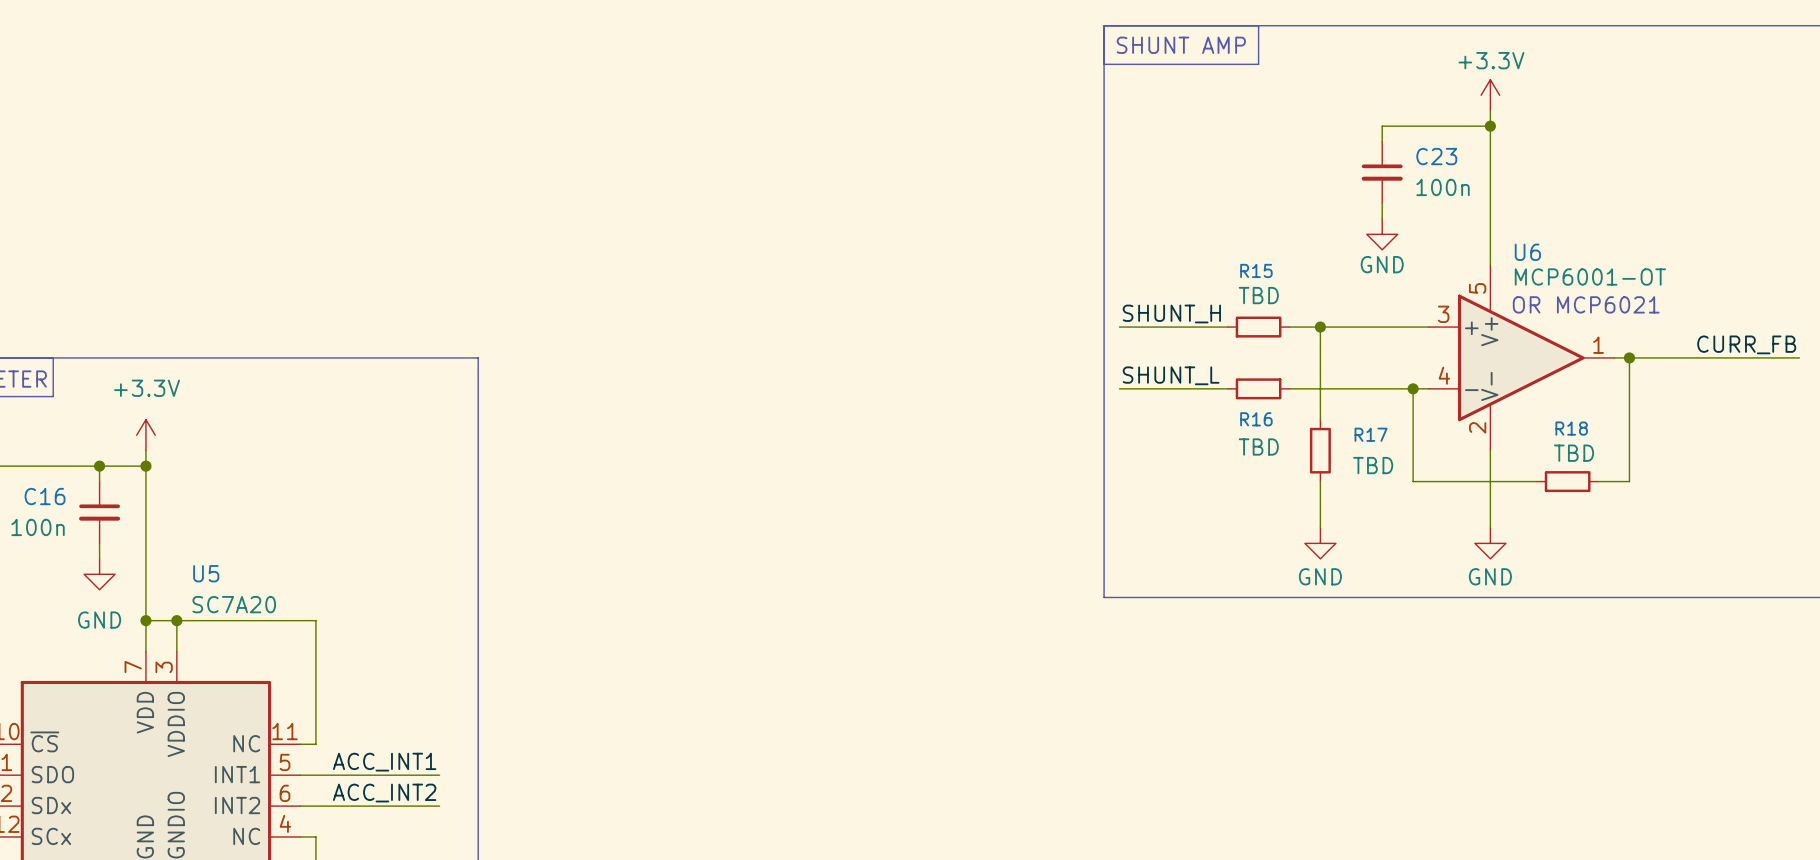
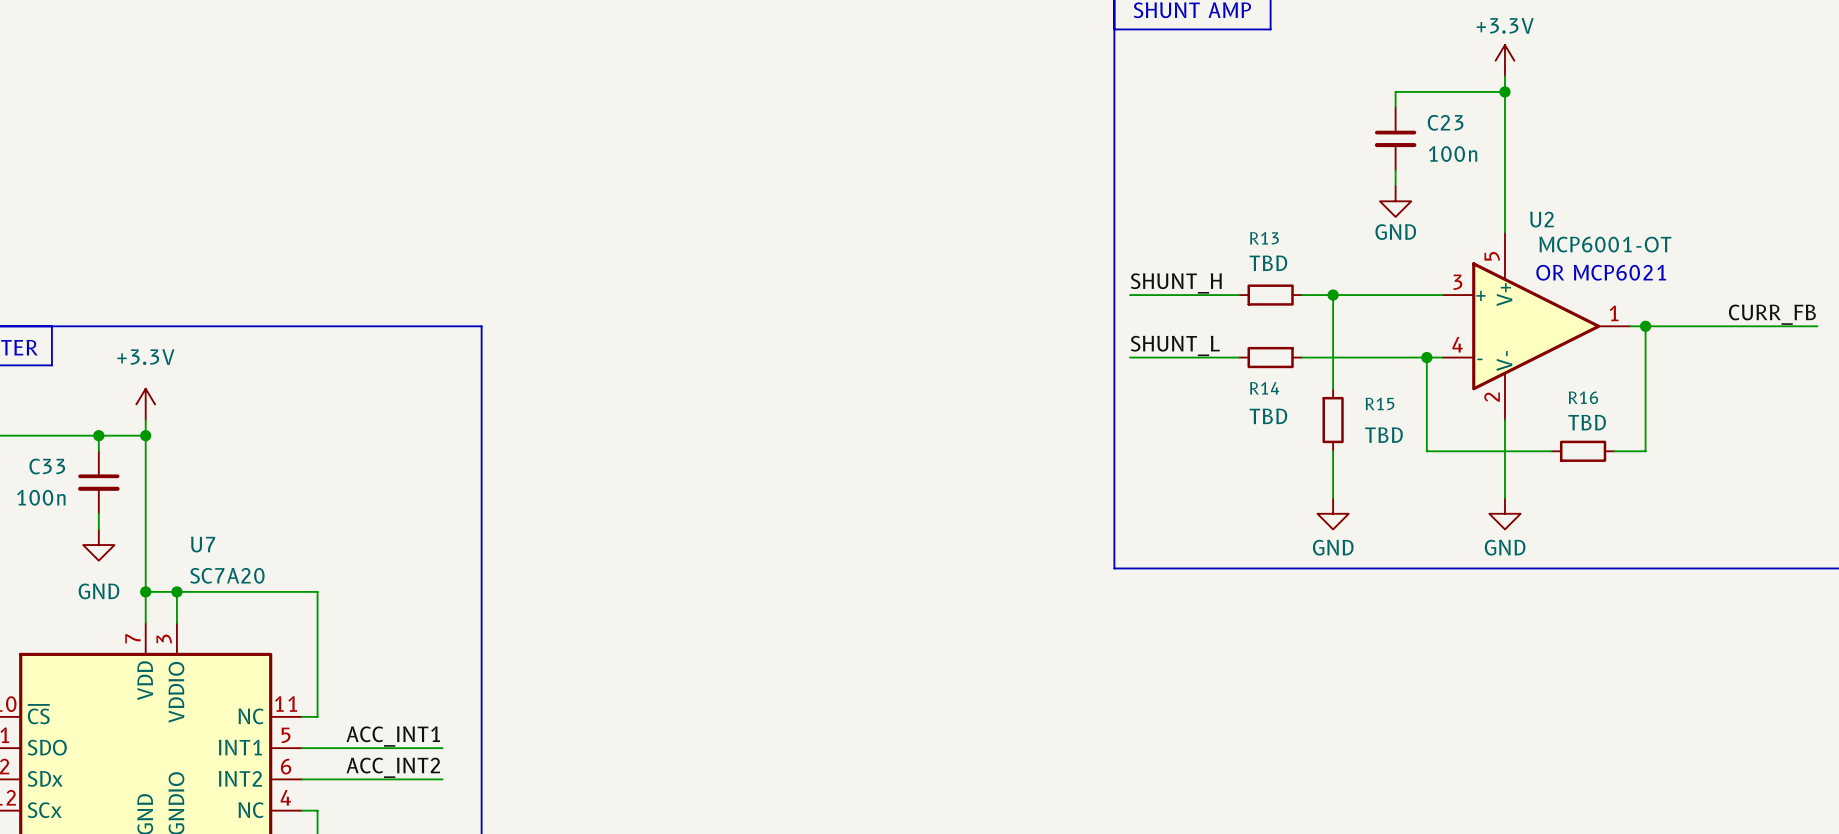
U6 name: U6 (1527, 252) -> U2 (1541, 219)
R15 name: R15 (1256, 270) -> R13 (1264, 238)
R16 name: R16 (1256, 419) -> R14 (1264, 388)
R18 name: R18 (1571, 428) -> R16 (1583, 397)
R17 name: R17 (1371, 434) -> R15 (1380, 403)
C16 name: C16 (45, 496) -> C33 (47, 466)
U5 name: U5 (206, 573) -> U7 (203, 544)

